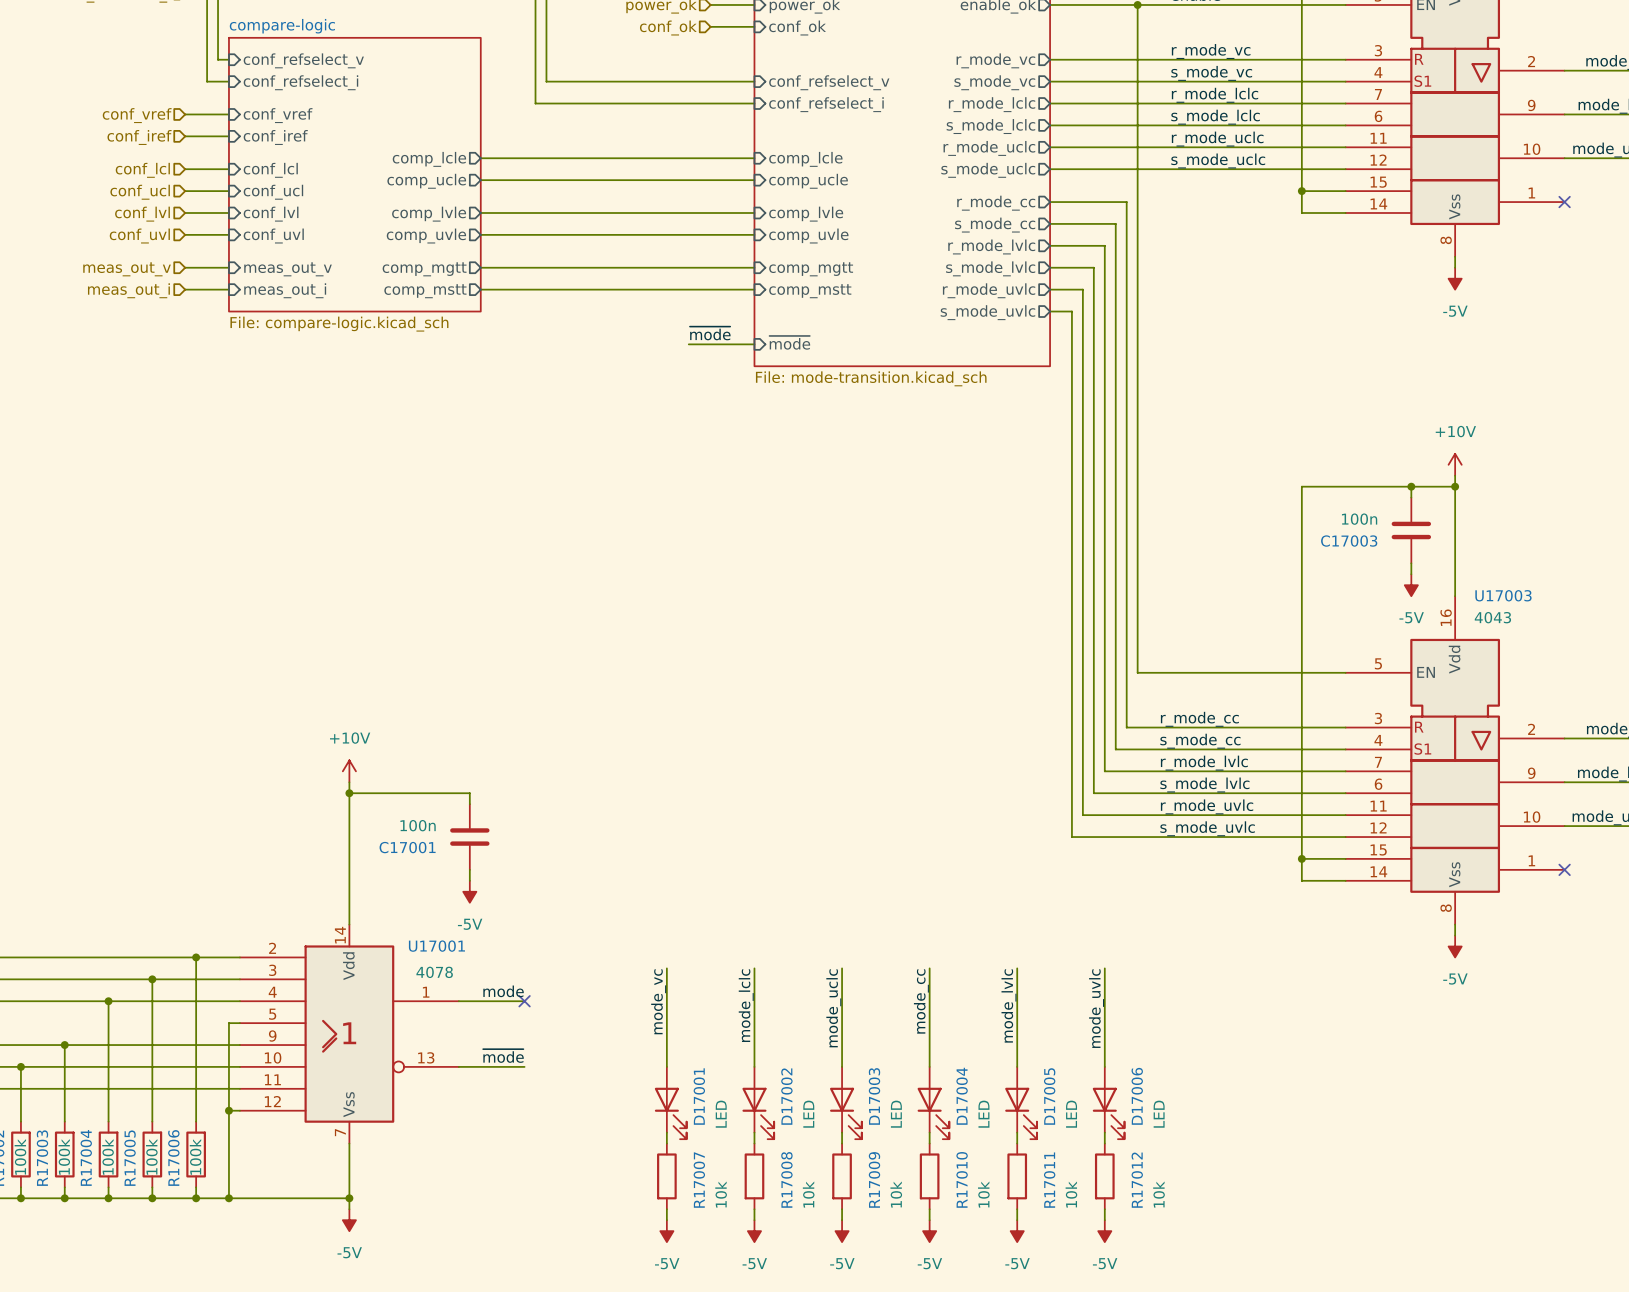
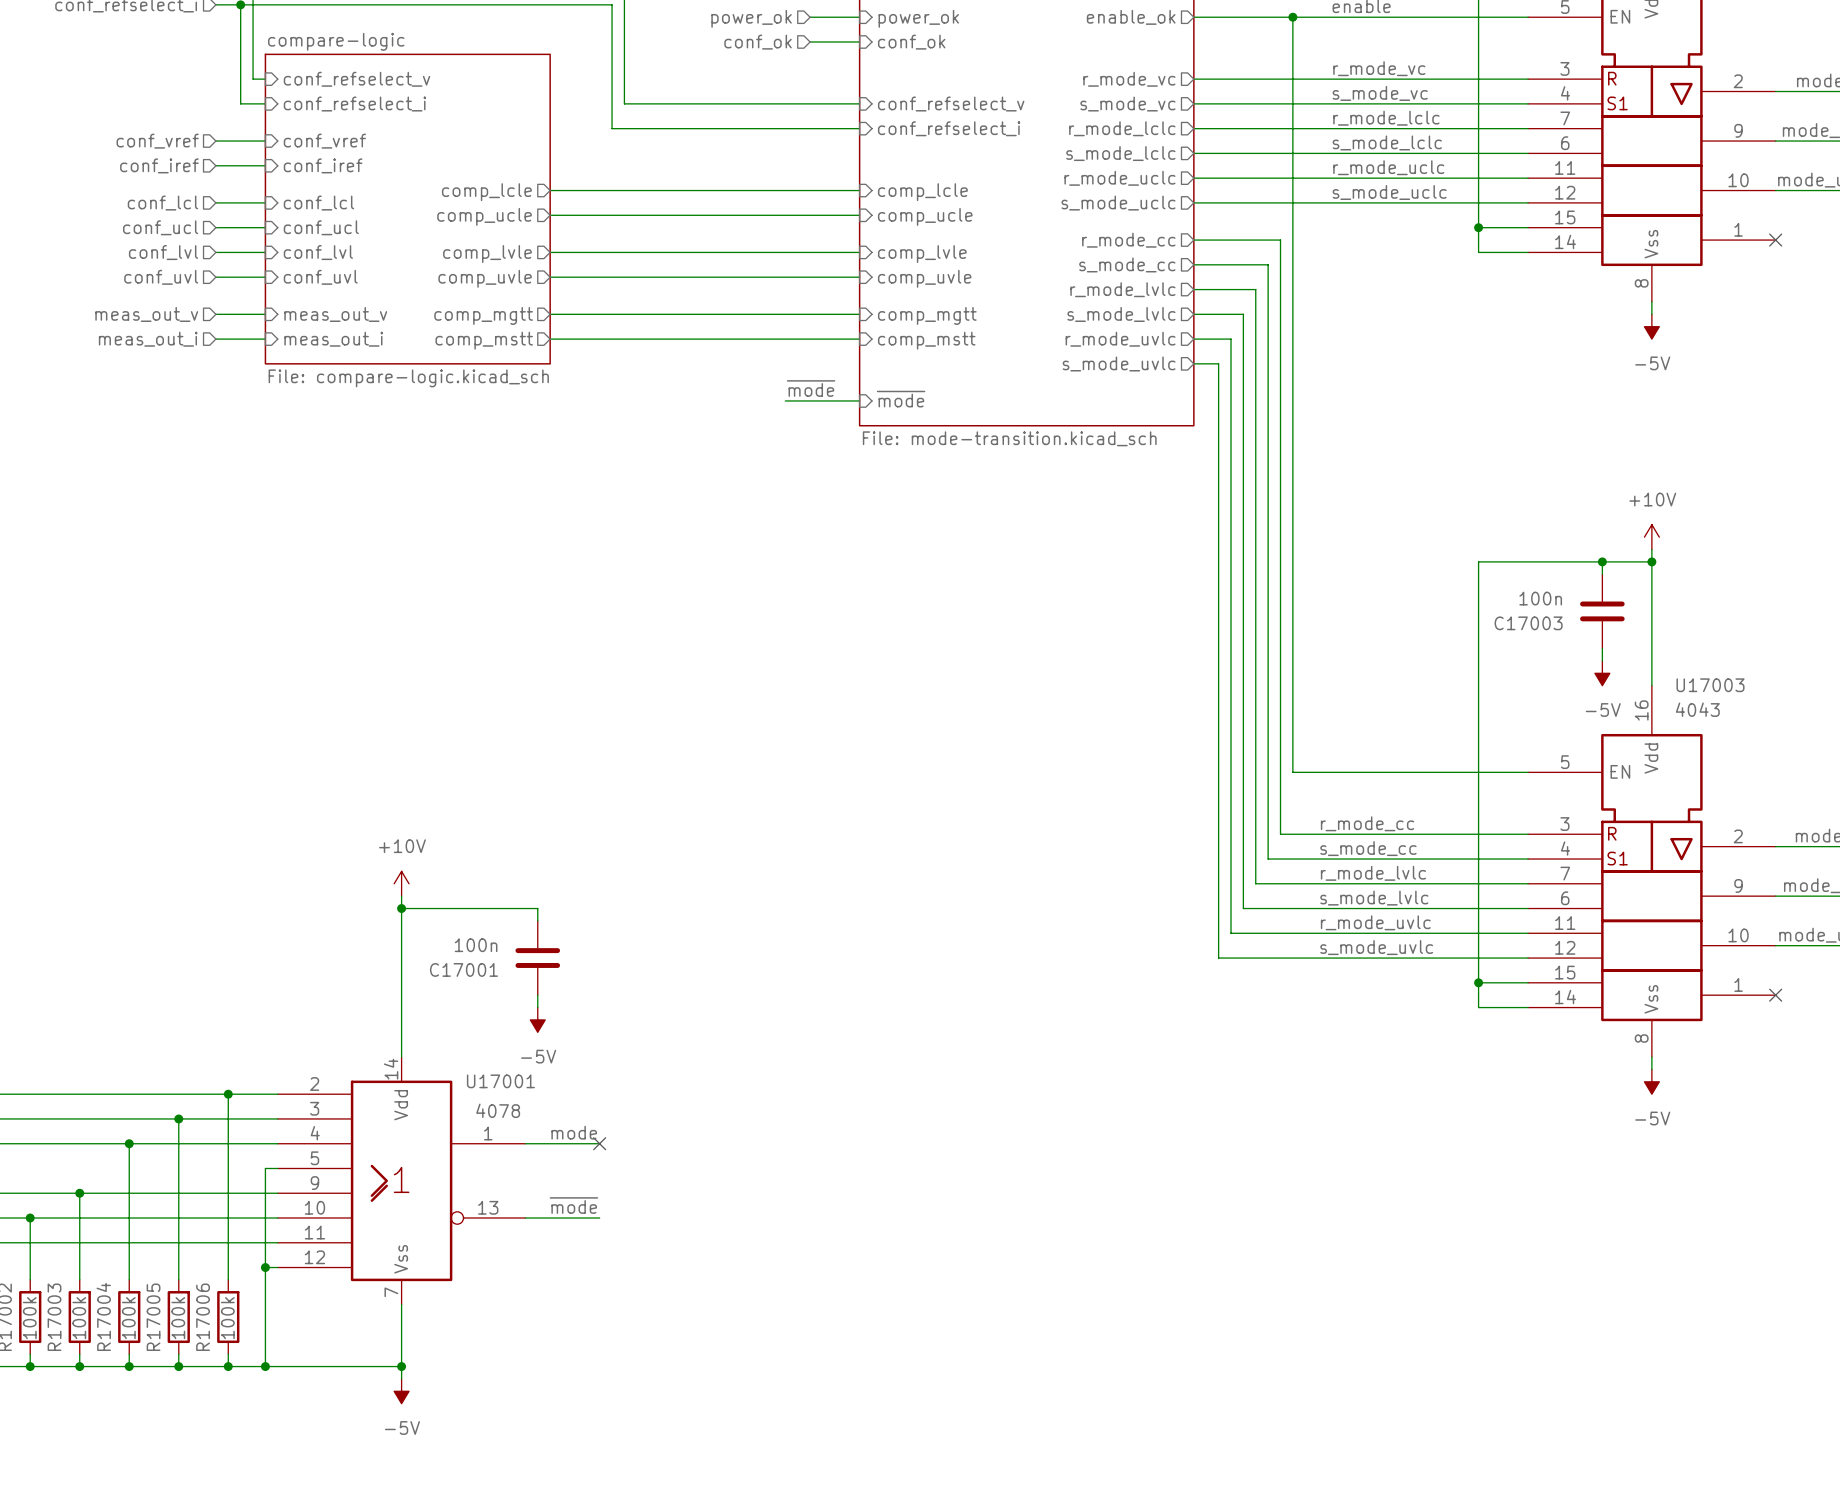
wire: (666, 968) (666, 1066) -> none
wire: (754, 968) (754, 1066) -> none
wire: (842, 968) (842, 1066) -> none
wire: (929, 968) (929, 1066) -> none
wire: (1017, 968) (1017, 1066) -> none
wire: (1104, 968) (1104, 1066) -> none
label: mode_vc (658, 1001) -> none
label: mode_cc (921, 1001) -> none
label: mode_lclc (746, 1005) -> none
label: mode_lvlc (1008, 1005) -> none
label: mode_uclc (833, 1008) -> none
label: mode_uvlc (1096, 1008) -> none
D17001: LED (670, 1103) -> none
D17002: LED (758, 1103) -> none
D17003: LED (845, 1103) -> none
D17004: LED (933, 1103) -> none
D17005: LED (1021, 1103) -> none
D17006: LED (1108, 1103) -> none
wire: (666, 1132) (666, 1143) -> none
wire: (754, 1132) (754, 1143) -> none
wire: (842, 1132) (842, 1143) -> none
wire: (929, 1132) (929, 1143) -> none
wire: (1017, 1132) (1017, 1143) -> none
wire: (1104, 1132) (1104, 1143) -> none
R17007: 10k (666, 1176) -> none
R17008: 10k (754, 1176) -> none
R17009: 10k (842, 1176) -> none
R17010: 10k (929, 1176) -> none
R17011: 10k (1017, 1176) -> none
R17012: 10k (1104, 1176) -> none
wire: (666, 1209) (666, 1220) -> none
wire: (754, 1209) (754, 1220) -> none
wire: (842, 1209) (842, 1220) -> none
wire: (929, 1209) (929, 1220) -> none
wire: (1017, 1209) (1017, 1220) -> none
wire: (1104, 1209) (1104, 1220) -> none
power symbol: -5V (666, 1231) -> none
power symbol: -5V (754, 1231) -> none
power symbol: -5V (842, 1231) -> none
power symbol: -5V (929, 1231) -> none
power symbol: -5V (1017, 1231) -> none
power symbol: -5V (1104, 1231) -> none

